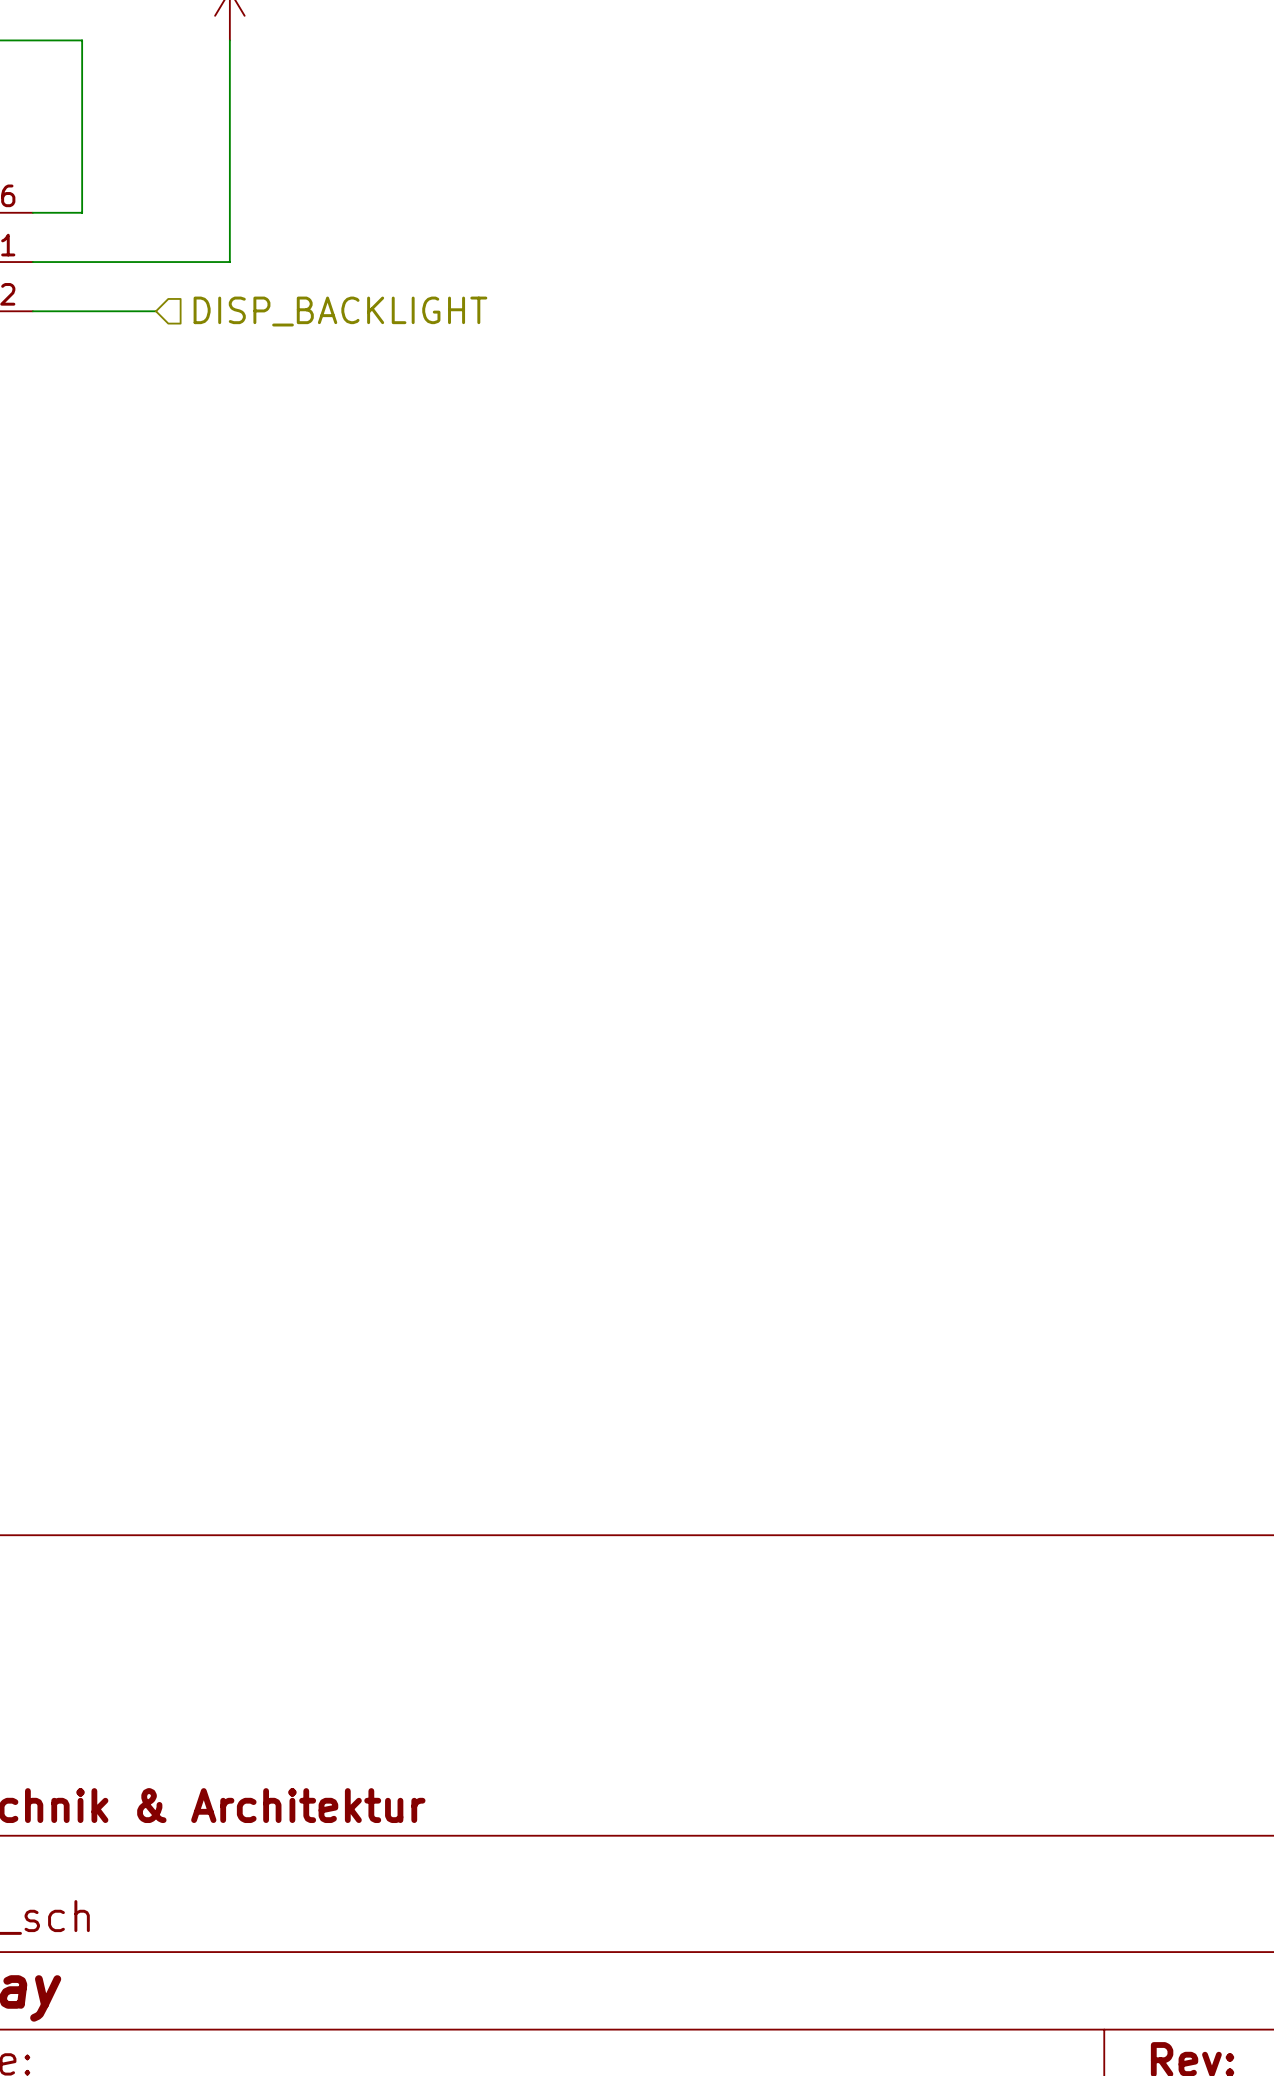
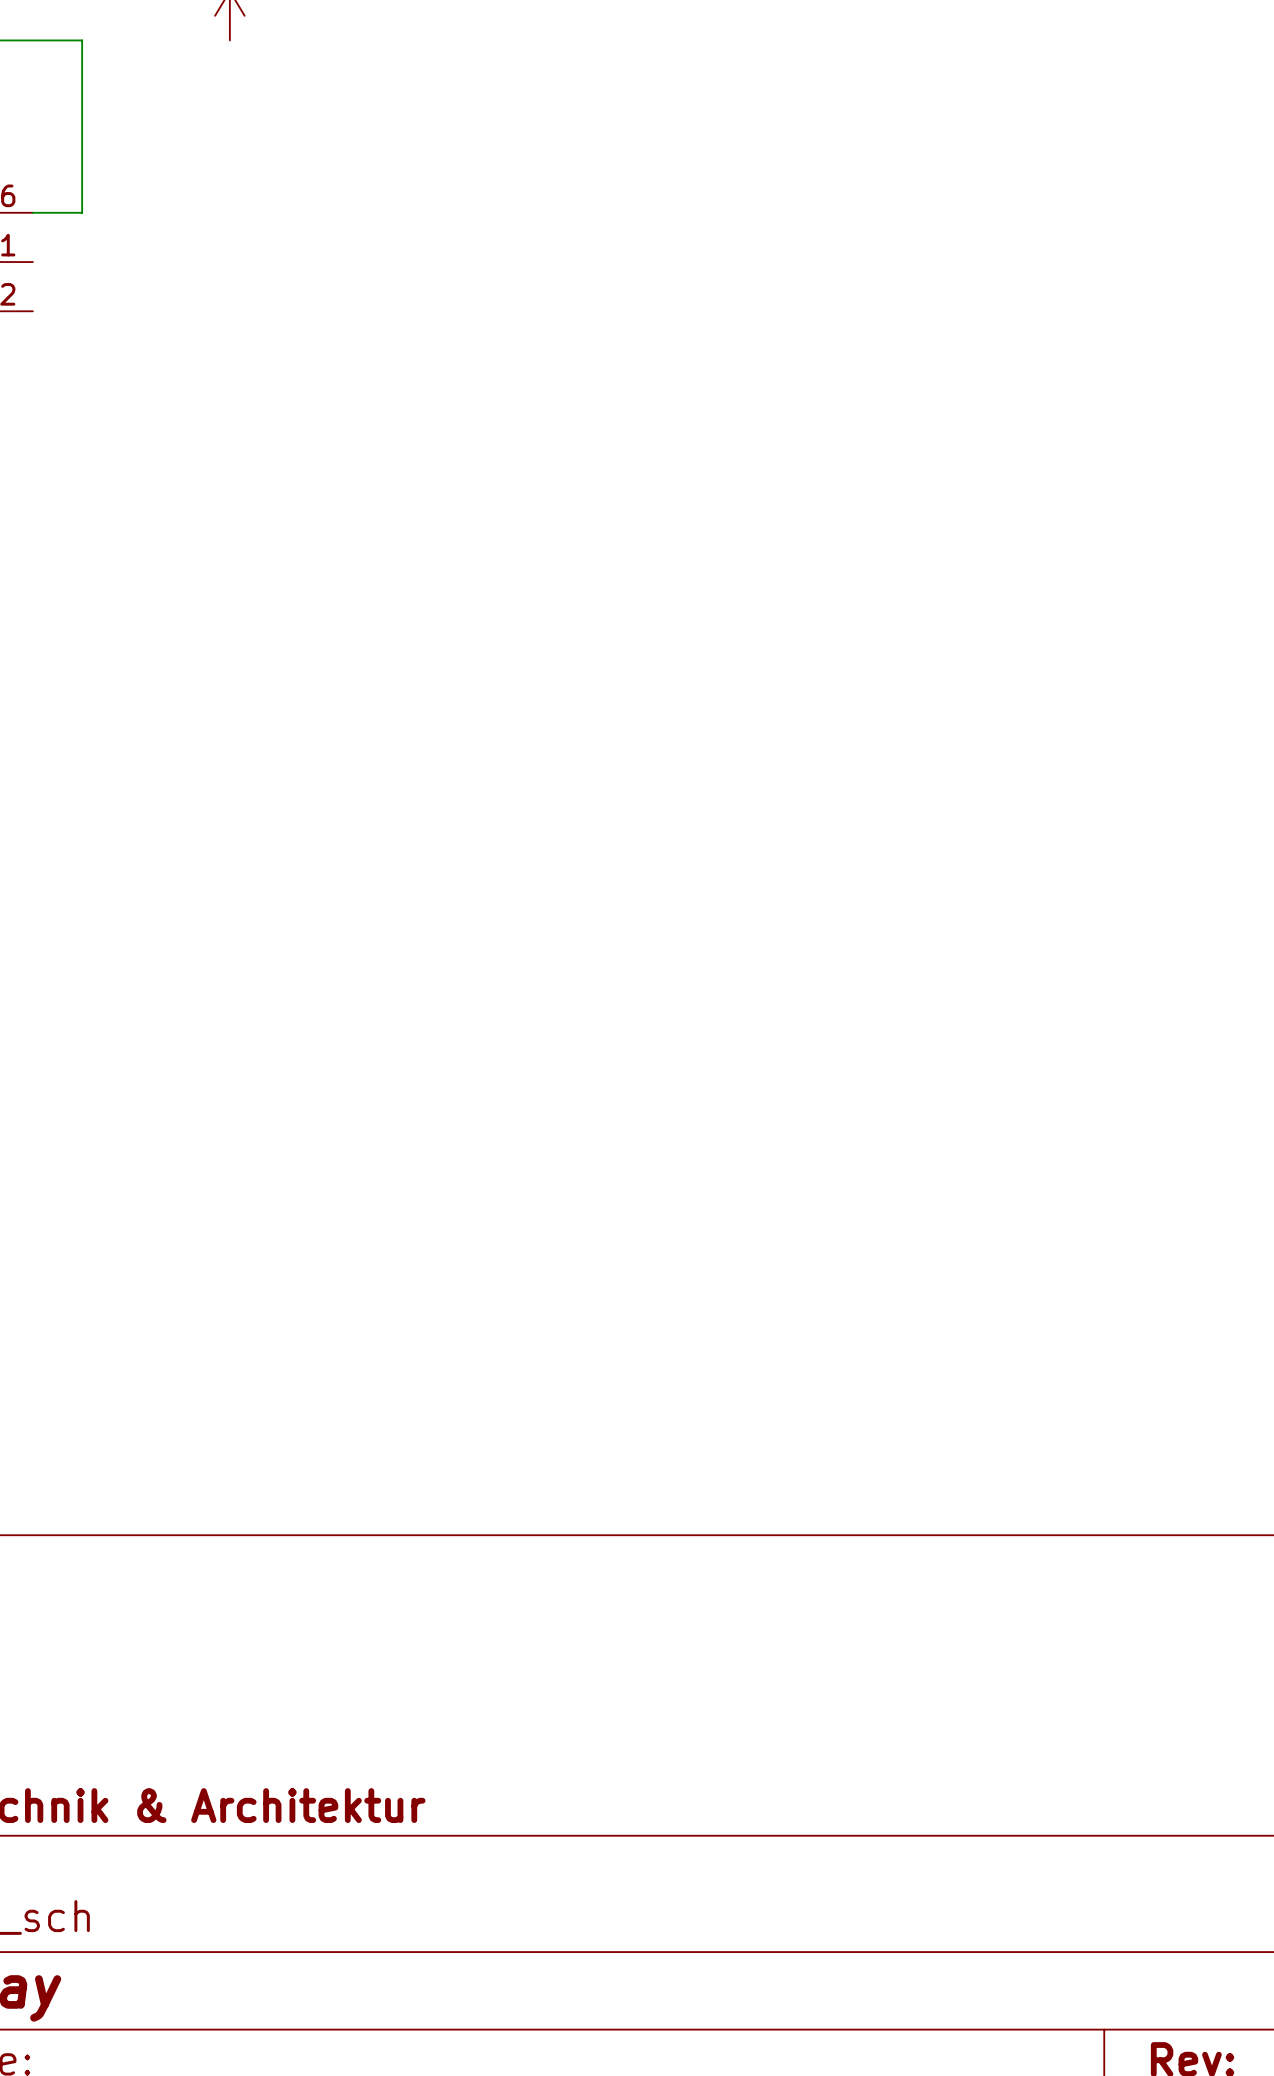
wire: (229, 40) (229, 262) (32, 262) -> none
wire: (32, 311) (156, 311) -> none
hierarchical label: DISP_BACKLIGHT (340, 311) -> none

